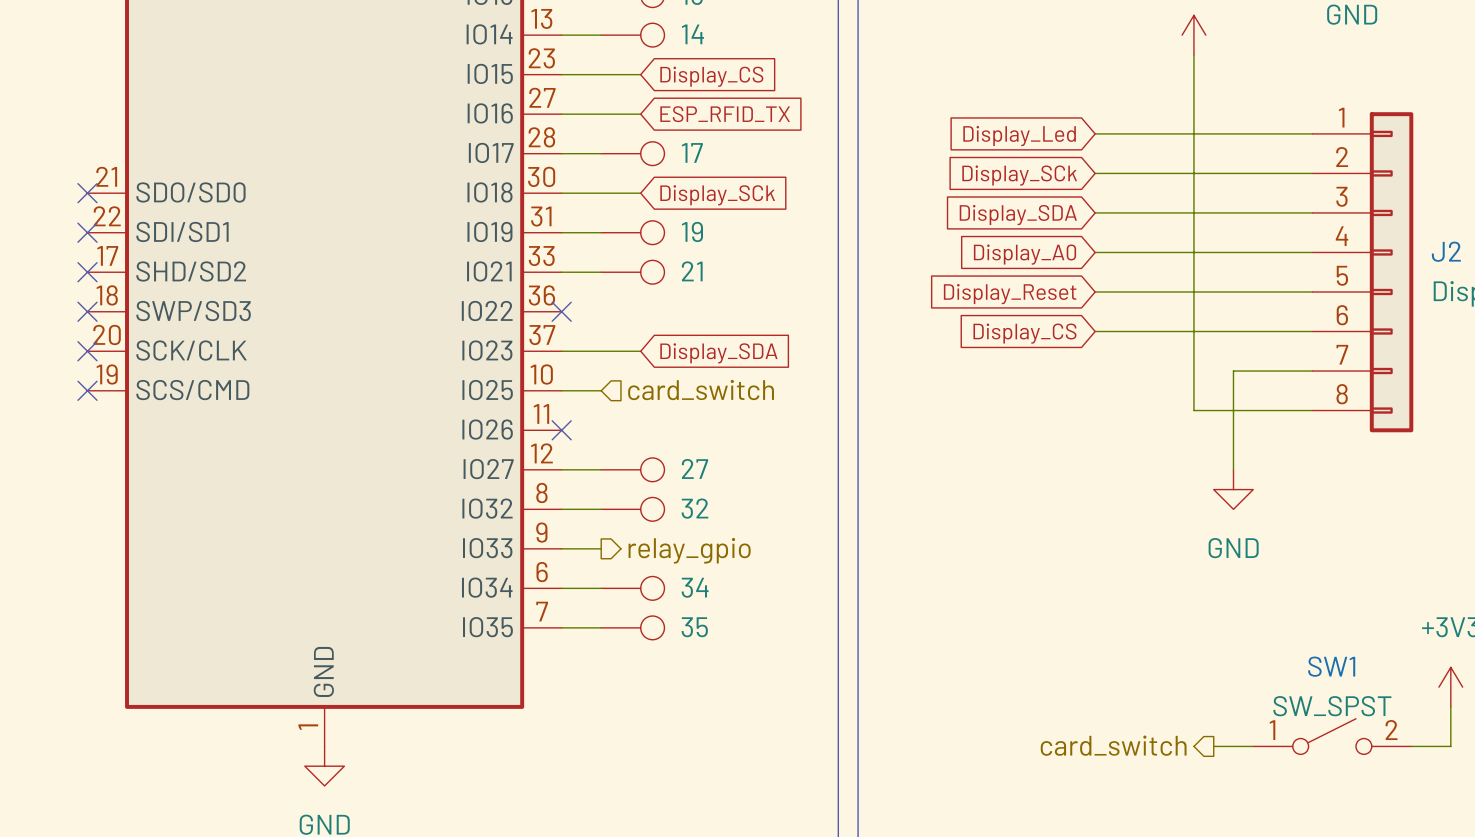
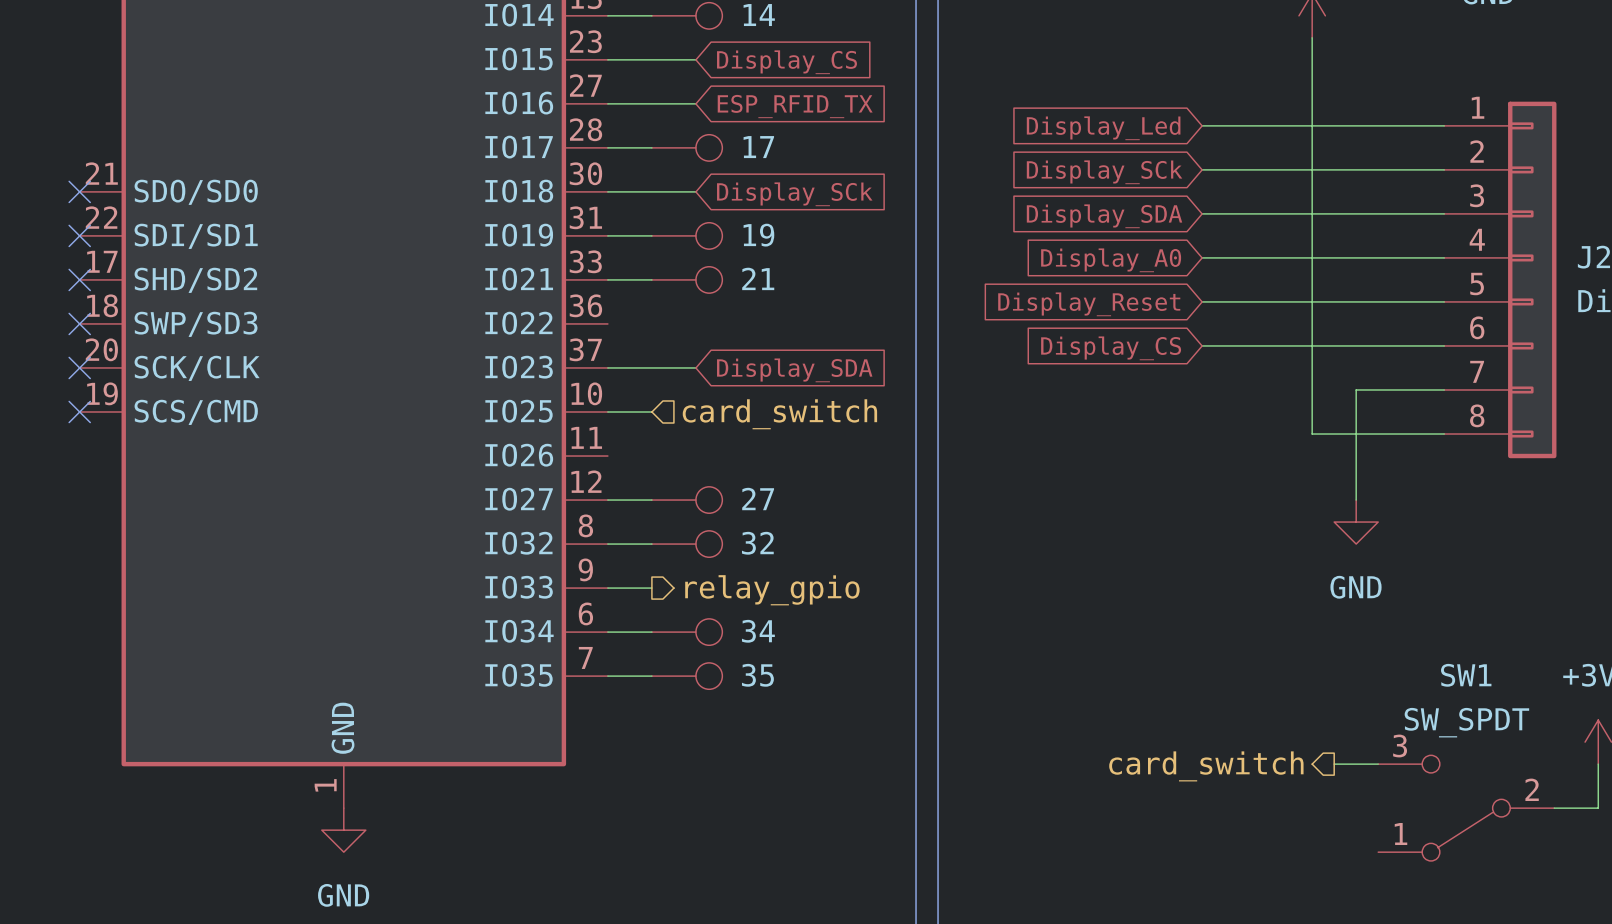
no-connect mark: (561, 311) -> none
no-connect mark: (561, 430) -> none
SW1 name position: SW1 (1331, 666) -> SW1 (1466, 675)
SW1 value: SW_SPST (1332, 706) -> SW_SPDT (1466, 722)
SW1 symbol: [1253, 718, 1412, 755] -> [1378, 755, 1555, 861]
hierarchical label position: card_switch (1113, 745) -> card_switch (1206, 766)
wire: (1213, 746) (1253, 746) -> (1334, 764) (1378, 764)

